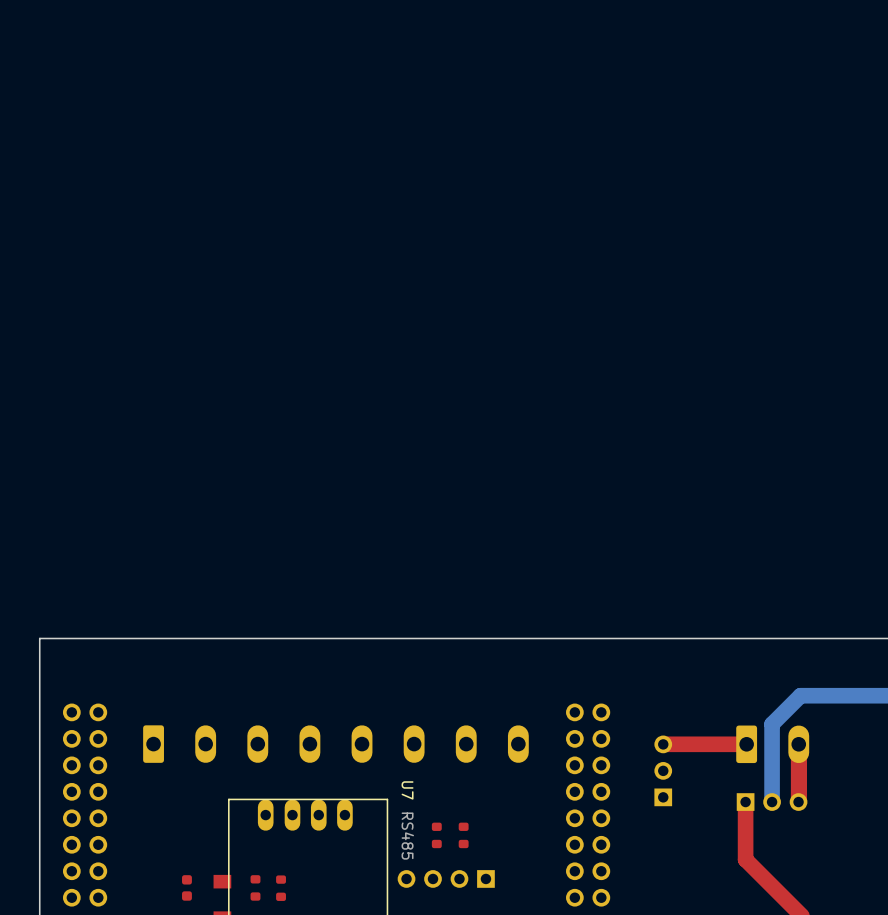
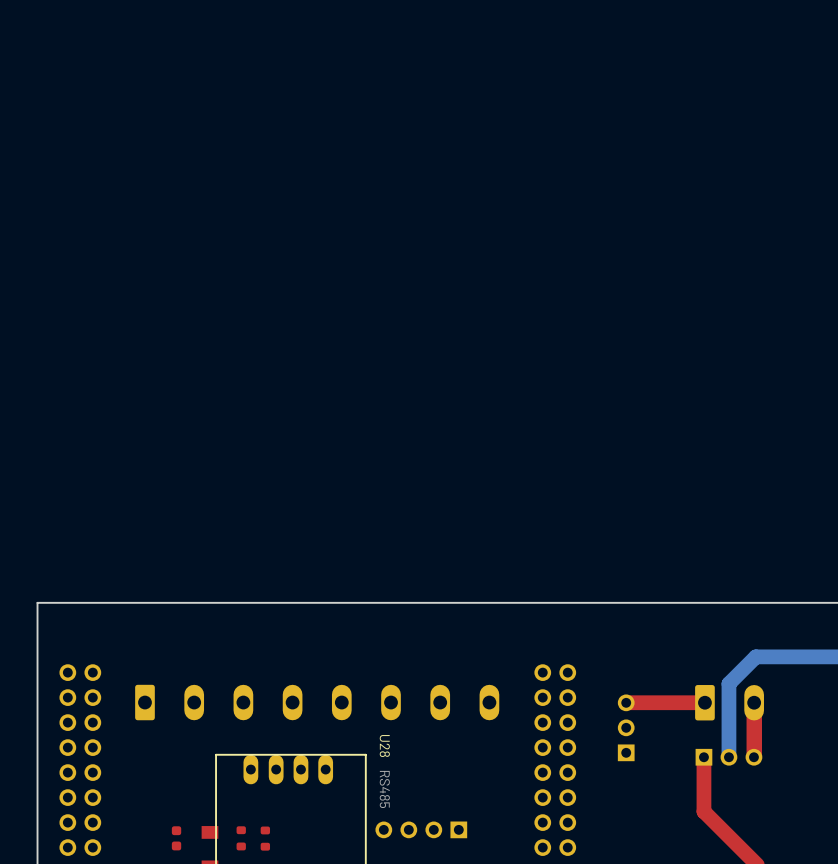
U7 name: U7 (407, 790) -> U28 (384, 746)
part: (436, 835) -> none
part: (463, 835) -> none

